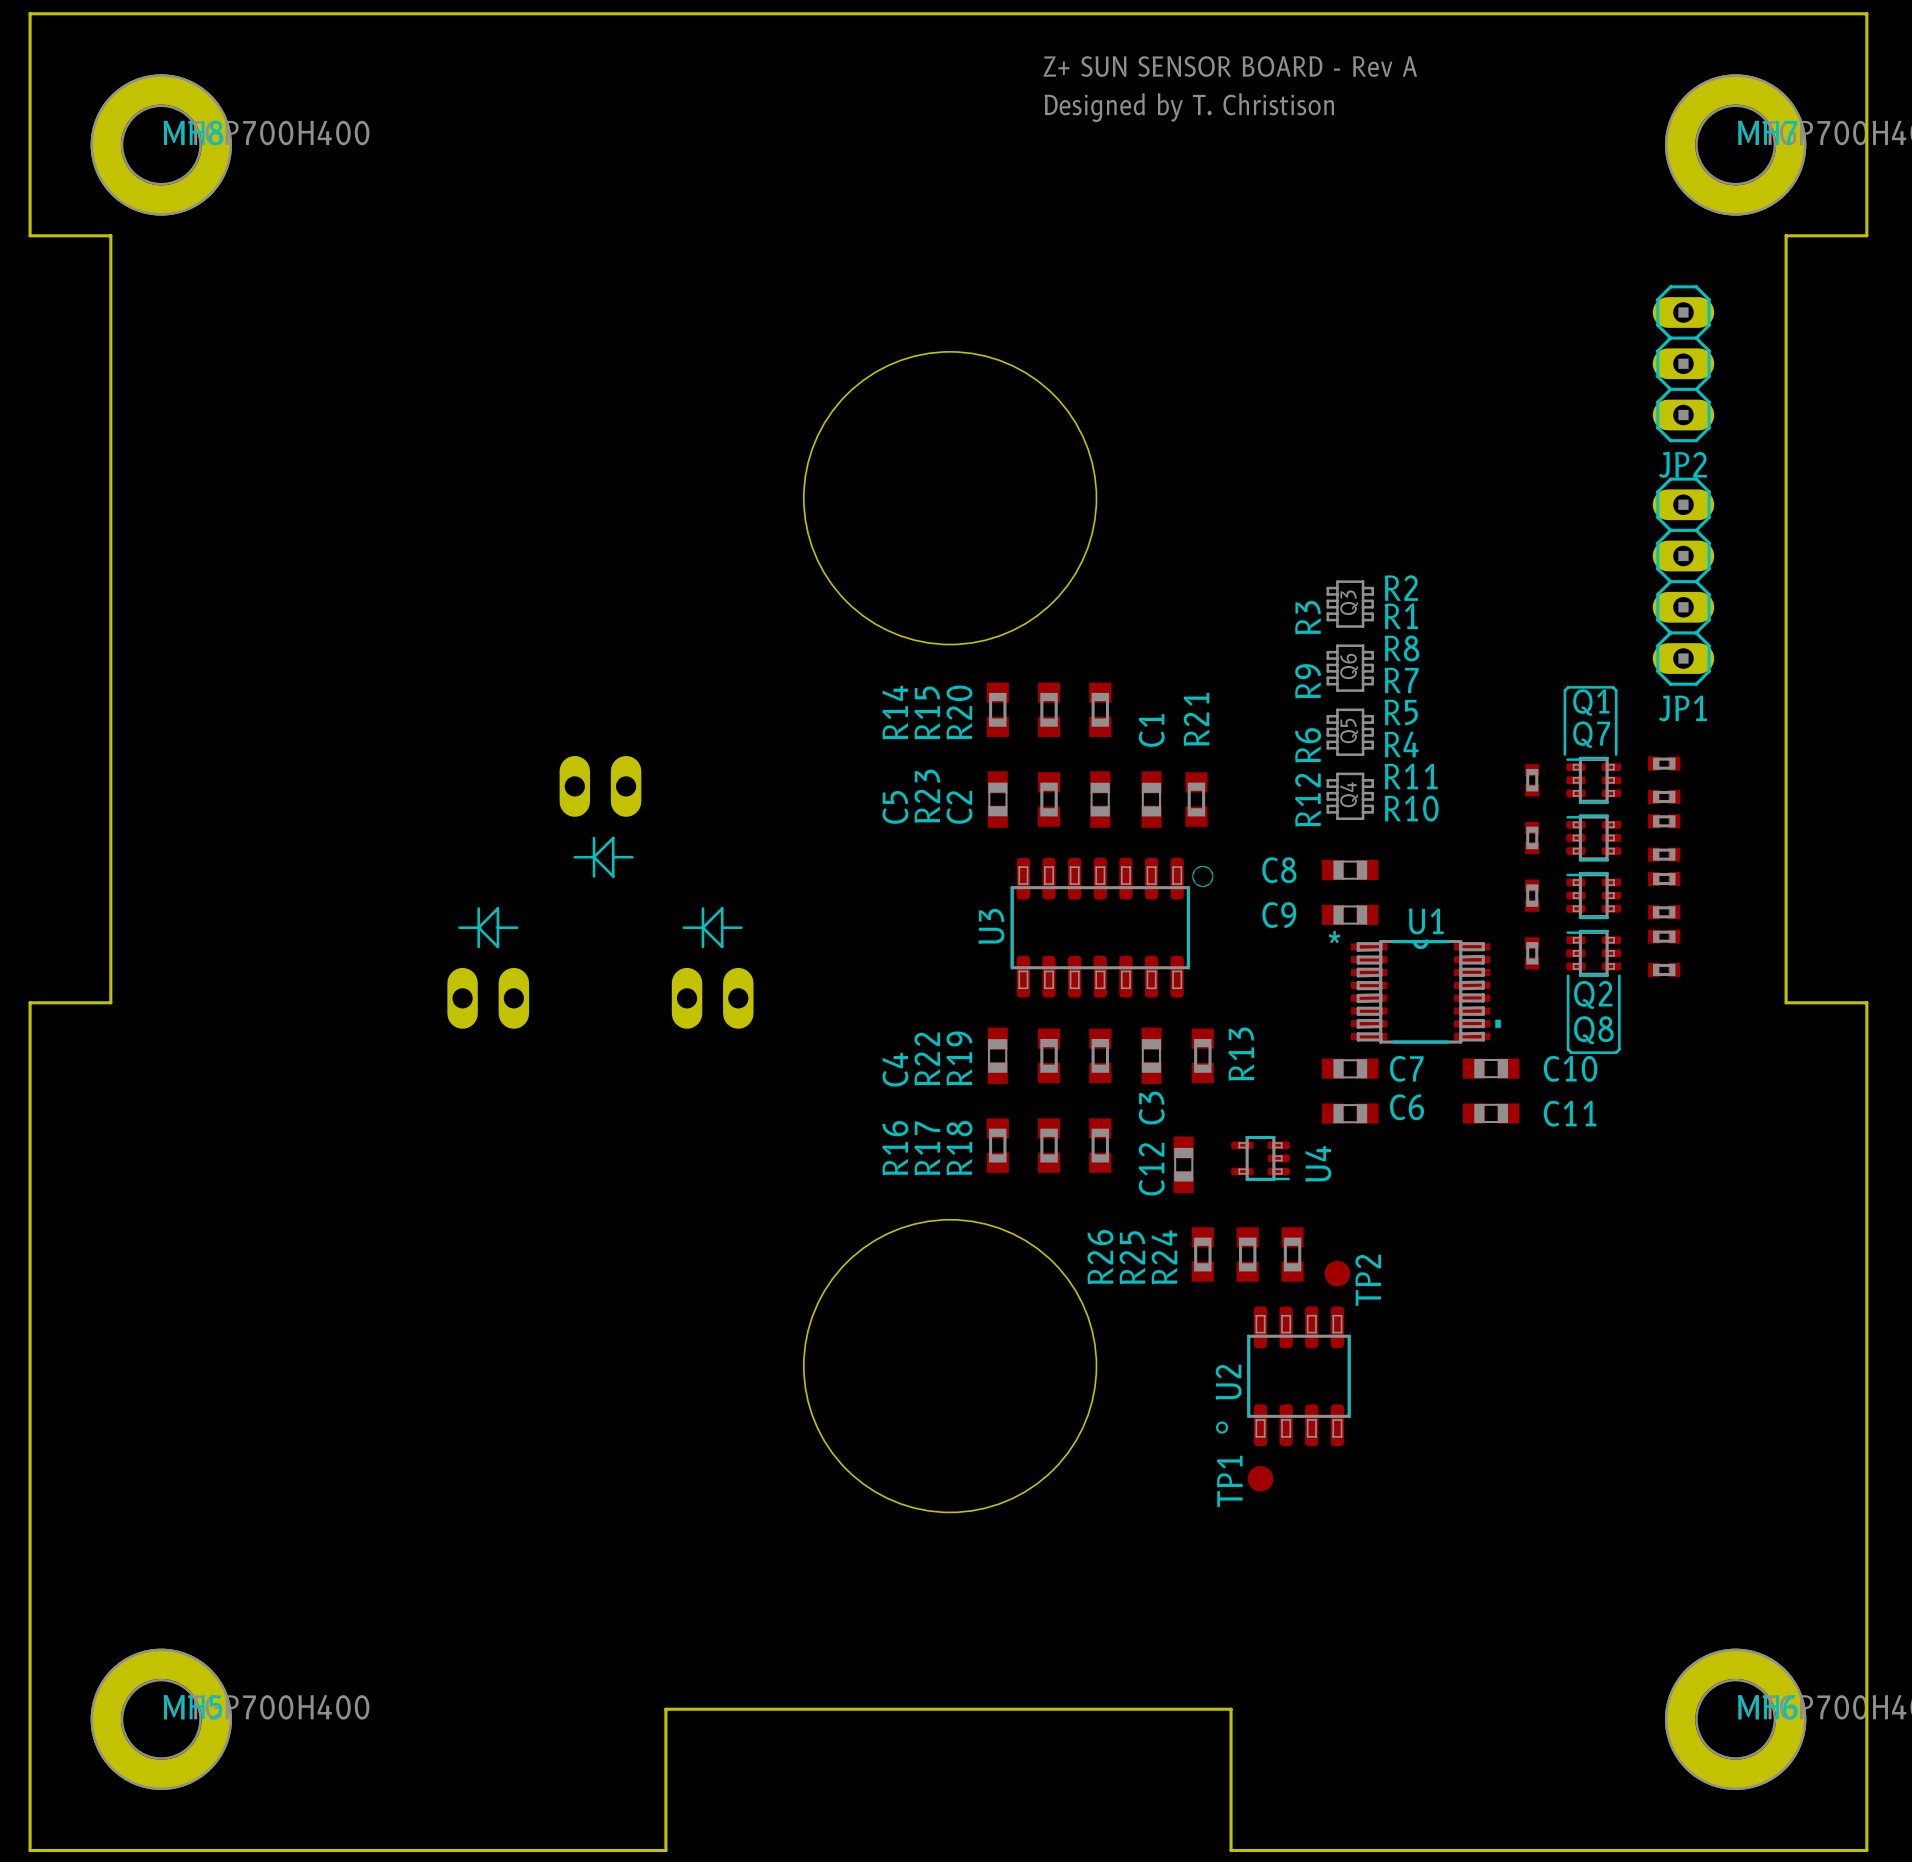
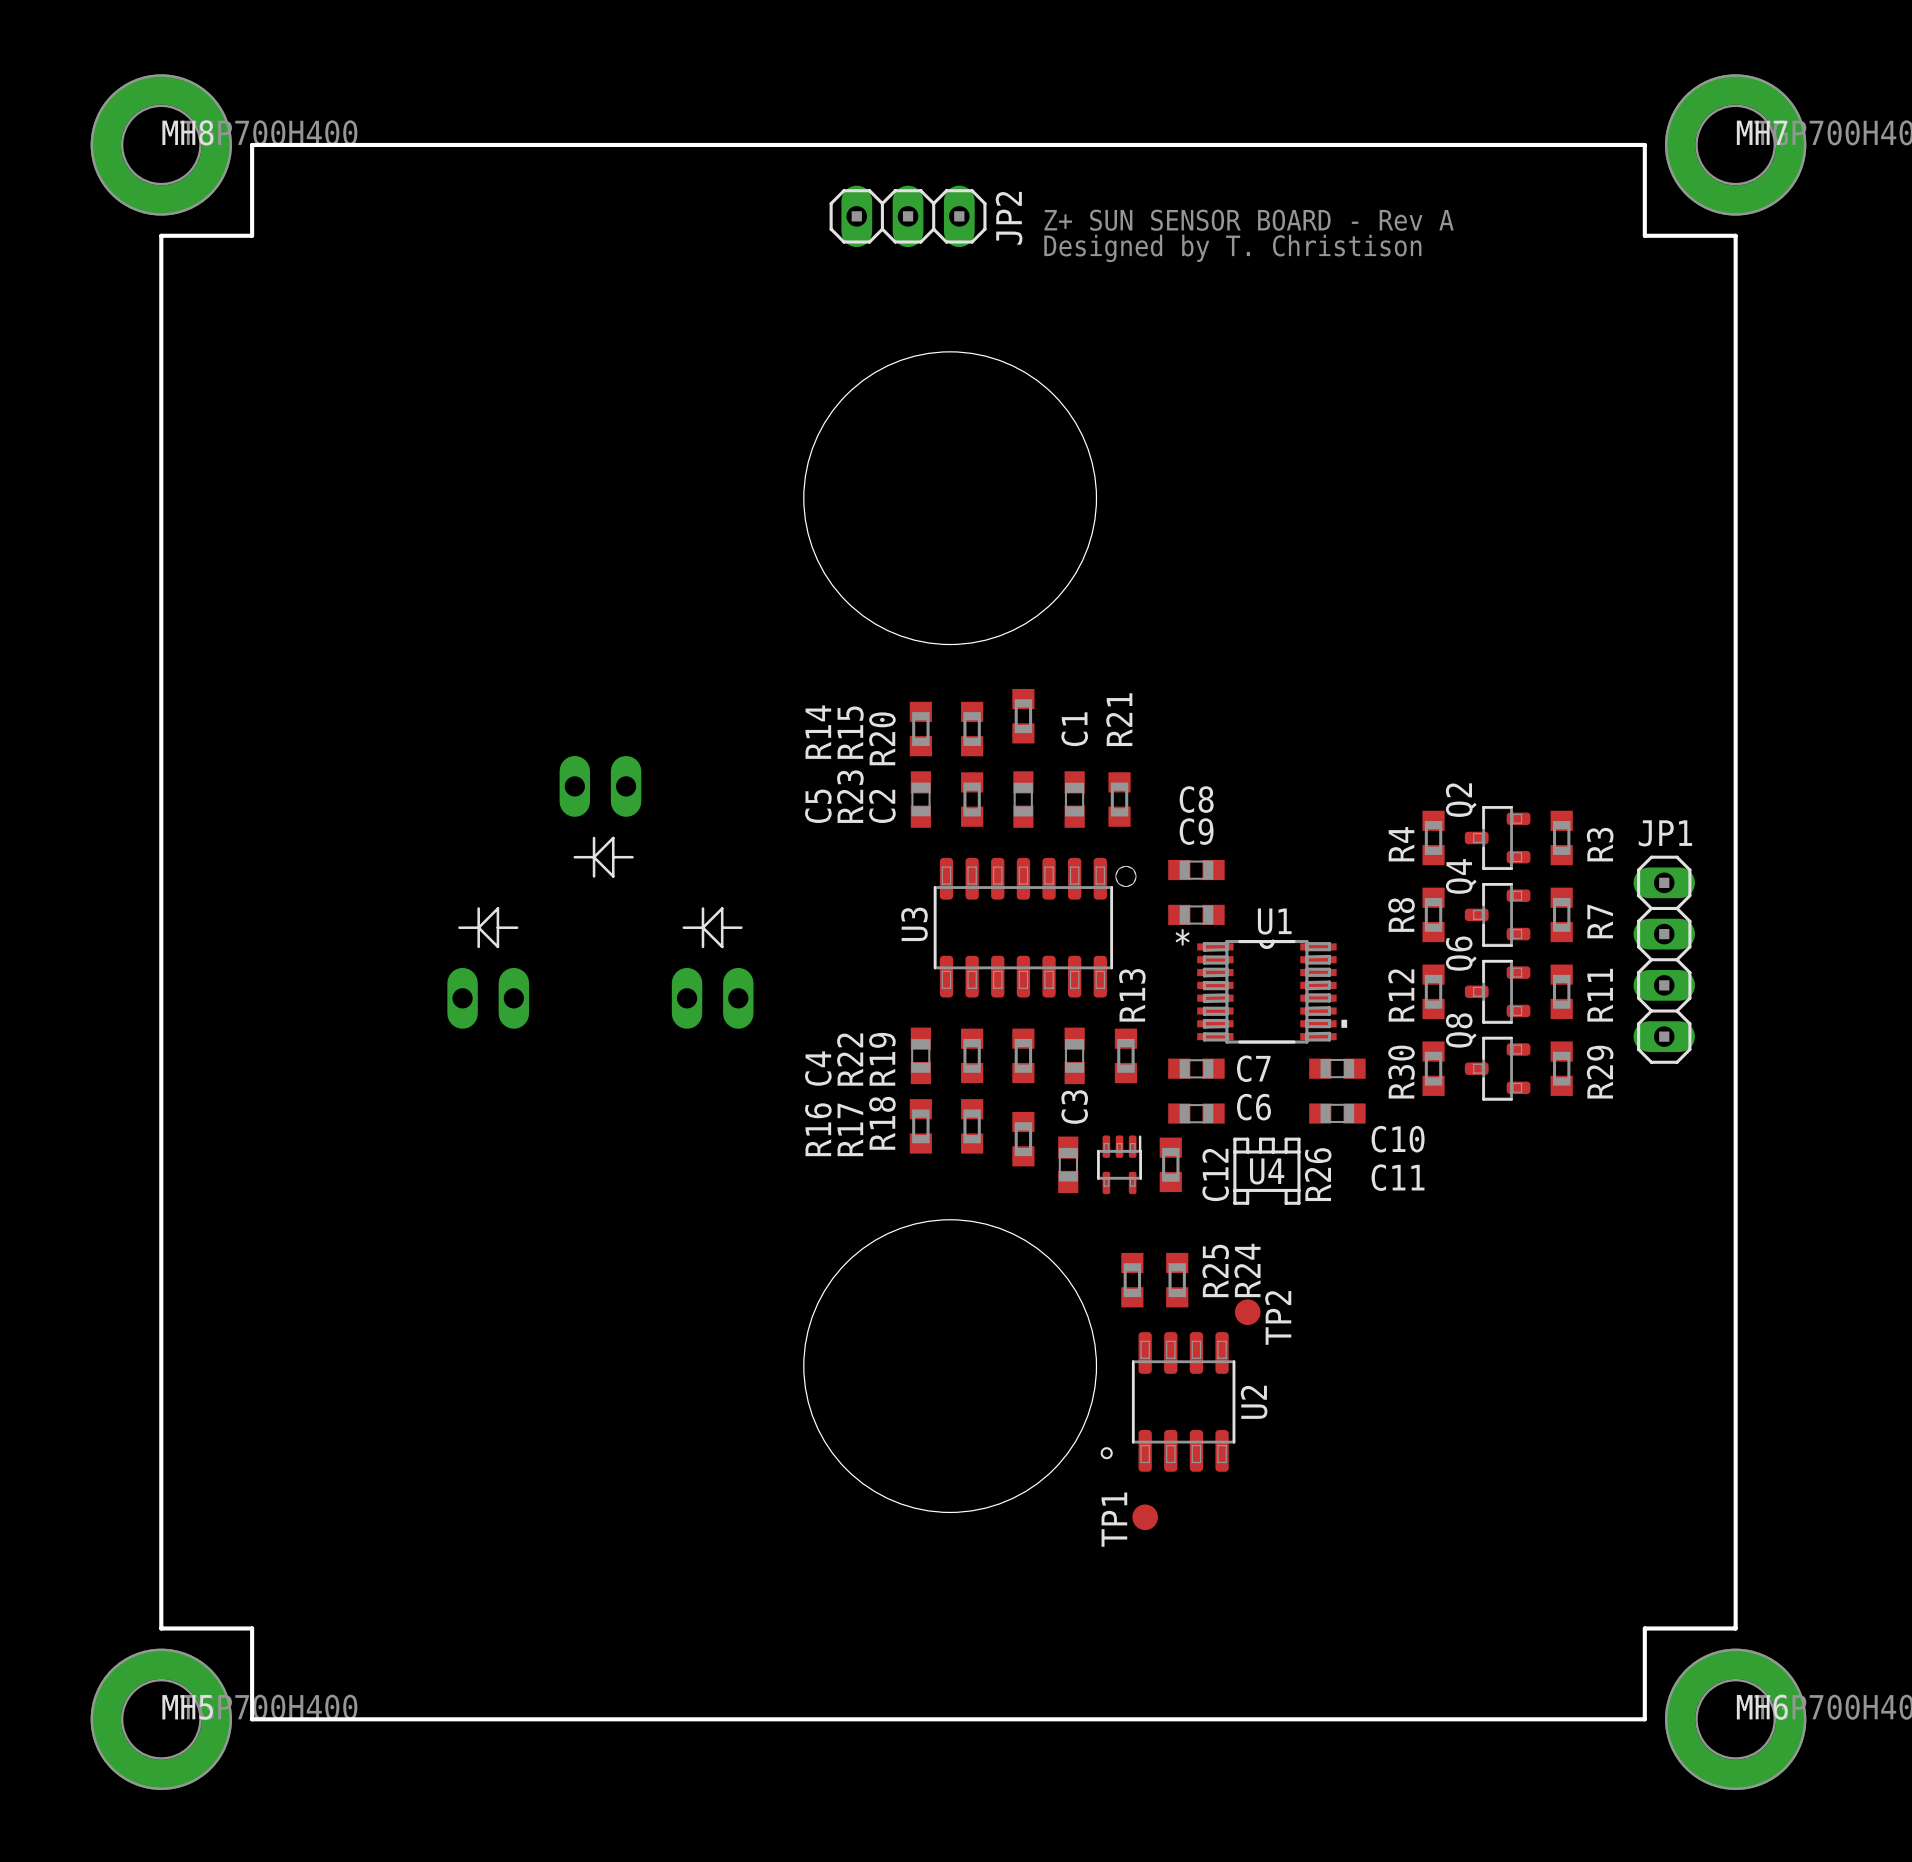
board edge: (30, 13) (1866, 13) (1866, 235) (1786, 235) (1786, 1002) (1866, 1002) (1866, 1850) (1231, 1850) (1231, 1709) (665, 1709) (665, 1850) (30, 1850) (30, 1002) (110, 1002) (110, 235) (30, 235) (30, 13) -> (252, 144) (252, 235) (161, 235) (161, 1628) (252, 1628) (252, 1719) (1644, 1719) (1644, 1628) (1735, 1628) (1735, 235) (1644, 235) (1644, 144) (252, 144)
text position: Z+ SUN SENSOR BOARD - Rev A (1230, 66) -> Z+ SUN SENSOR BOARD - Rev A (1249, 220)
text position: Designed by T. Christison (1189, 107) -> Designed by T. Christison (1232, 248)
JP2 rotation: 0° (1683, 363) -> 90° clockwise (908, 216)
JP2 position: (1683, 363) -> (908, 216)
JP2 name position: JP2 (1682, 464) -> JP2 (1009, 218)
line: (1337, 581) (1363, 581) (1363, 626) (1337, 626) (1337, 581) -> none
JP1 position: (1683, 581) -> (1664, 959)
line: (1337, 588) (1327, 588) (1327, 594) (1337, 594) -> none
line: (1363, 588) (1372, 588) (1372, 594) (1363, 594) -> none
line: (1337, 600) (1327, 600) (1327, 607) (1337, 607) -> none
line: (1363, 600) (1372, 600) (1372, 607) (1363, 607) -> none
text: Q3 (1349, 602) -> none
line: (1337, 613) (1327, 613) (1327, 620) (1337, 620) -> none
line: (1363, 613) (1372, 613) (1372, 620) (1363, 620) -> none
R3 name position: R3 (1308, 617) -> R3 (1600, 844)
line: (1337, 645) (1337, 690) (1363, 690) (1363, 645) (1337, 645) -> none
R8 name position: R8 (1401, 648) -> R8 (1401, 914)
line: (1337, 652) (1327, 652) (1327, 658) (1337, 658) -> none
line: (1363, 652) (1372, 652) (1372, 658) (1363, 658) -> none
line: (1337, 664) (1327, 664) (1327, 671) (1337, 671) -> none
line: (1363, 664) (1372, 664) (1372, 671) (1363, 671) -> none
text: Q6 (1349, 666) -> none
line: (1337, 677) (1327, 677) (1327, 684) (1337, 684) -> none
line: (1363, 677) (1372, 677) (1372, 684) (1363, 684) -> none
R7 name position: R7 (1401, 680) -> R7 (1600, 921)
JP1 name position: JP1 (1682, 708) -> JP1 (1665, 833)
R14 position: (997, 709) -> (920, 729)
R15 position: (1049, 709) -> (972, 729)
R20 position: (1100, 709) -> (1023, 716)
line: (1337, 709) (1337, 754) (1363, 754) (1363, 709) (1337, 709) -> none
R20 name position: R20 (959, 712) -> R20 (882, 738)
line: (1337, 716) (1327, 716) (1327, 722) (1337, 722) -> none
line: (1363, 716) (1372, 716) (1372, 722) (1363, 722) -> none
line: (1337, 729) (1327, 729) (1327, 735) (1337, 735) -> none
line: (1363, 729) (1372, 729) (1372, 735) (1363, 735) -> none
text: Q5 (1349, 730) -> none
line: (1337, 741) (1327, 741) (1327, 748) (1337, 748) -> none
line: (1363, 741) (1372, 741) (1372, 748) (1363, 748) -> none
R4 name position: R4 (1401, 744) -> R4 (1401, 844)
line: (1564, 754) (1564, 690) (1568, 687) (1612, 687) (1616, 690) (1616, 754) -> none
R2: (1664, 763) -> none
R3 footprint: [1525, 764, 1540, 797] -> [1550, 810, 1573, 866]
line: (1337, 773) (1337, 818) (1363, 818) (1363, 773) (1337, 773) -> none
R11 name position: R11 (1411, 776) -> R11 (1600, 995)
line: (1337, 780) (1327, 780) (1327, 786) (1337, 786) -> none
line: (1363, 780) (1372, 780) (1372, 786) (1363, 786) -> none
Q1: (1593, 780) -> none
line: (1337, 793) (1327, 793) (1327, 799) (1337, 799) -> none
line: (1363, 793) (1372, 793) (1372, 799) (1363, 799) -> none
text: Q4 (1349, 794) -> none
R1: (1664, 796) -> none
C5 position: (997, 799) -> (920, 799)
R23 position: (1049, 799) -> (972, 799)
C2 position: (1100, 799) -> (1023, 799)
C1 position: (1151, 799) -> (1074, 799)
R21 position: (1196, 799) -> (1119, 799)
R12 name position: R12 (1307, 800) -> R12 (1401, 995)
line: (1337, 805) (1327, 805) (1327, 812) (1337, 812) -> none
line: (1363, 805) (1372, 805) (1372, 812) (1363, 812) -> none
R8 footprint: [1648, 814, 1681, 829] -> [1422, 887, 1445, 943]
R9: (1532, 837) -> none
Q7: (1593, 837) -> none
R7 footprint: [1648, 847, 1681, 862] -> [1550, 887, 1573, 943]
C8 name position: C8 (1279, 870) -> C8 (1196, 799)
C8 position: (1350, 870) -> (1196, 870)
Q2 footprint: [1566, 872, 1622, 920] -> [1464, 806, 1531, 870]
R5: (1664, 878) -> none
R6: (1532, 895) -> none
R4 footprint: [1648, 905, 1681, 920] -> [1422, 810, 1445, 866]
C9 position: (1350, 914) -> (1196, 914)
Q4: none -> (1497, 914)
C9 name position: C9 (1279, 915) -> C9 (1196, 831)
U3 position: (1112, 927) -> (1035, 927)
Q8 footprint: [1566, 929, 1622, 977] -> [1464, 1036, 1531, 1101]
R11 footprint: [1648, 929, 1681, 944] -> [1550, 964, 1573, 1020]
R12 footprint: [1525, 937, 1540, 970] -> [1422, 964, 1445, 1020]
R10: (1664, 969) -> none
line: (1568, 975) (1568, 1049) (1571, 1052) (1616, 1052) (1619, 1049) (1619, 975) -> none
U1 position: (1425, 991) -> (1272, 991)
Q6: none -> (1497, 991)
Q2 name position: Q2 (1593, 994) -> Q2 (1461, 800)
Q8 name position: Q8 (1593, 1030) -> Q8 (1461, 1030)
R13 name position: R13 (1241, 1054) -> R13 (1132, 995)
C4 position: (997, 1055) -> (920, 1055)
R22 position: (1049, 1055) -> (972, 1055)
R19 position: (1100, 1055) -> (1023, 1055)
C3 position: (1151, 1055) -> (1074, 1055)
R13 position: (1202, 1055) -> (1125, 1055)
C7 position: (1350, 1068) -> (1196, 1068)
R30: none -> (1433, 1068)
C10 position: (1491, 1068) -> (1337, 1068)
R29: none -> (1561, 1068)
C10 name position: C10 (1570, 1068) -> C10 (1398, 1139)
C6 position: (1350, 1113) -> (1196, 1113)
C11 position: (1491, 1113) -> (1337, 1113)
C11 name position: C11 (1570, 1113) -> C11 (1398, 1177)
R16 position: (997, 1145) -> (920, 1126)
R17 position: (1049, 1145) -> (972, 1126)
R18 position: (1100, 1145) -> (1023, 1139)
R18 name position: R18 (959, 1148) -> R18 (882, 1123)
line: none -> (1234, 1151) (1298, 1151)
line: none -> (1247, 1151) (1247, 1139) (1234, 1139) (1234, 1203) (1247, 1203) (1247, 1190)
line: none -> (1260, 1151) (1260, 1139) (1273, 1139) (1273, 1151)
line: none -> (1286, 1151) (1286, 1139) (1298, 1139) (1298, 1203) (1286, 1203) (1286, 1190)
U4 rotation: 0° (1260, 1158) -> 90° counterclockwise (1119, 1164)
U4 position: (1260, 1158) -> (1119, 1164)
U4 name position: U4 (1318, 1163) -> U4 (1267, 1171)
C12 position: (1183, 1164) -> (1068, 1164)
C12 name position: C12 (1151, 1169) -> C12 (1215, 1174)
line: none -> (1234, 1190) (1298, 1190)
R26 position: (1202, 1254) -> (1170, 1164)
R25 position: (1247, 1254) -> (1132, 1280)
R24 position: (1292, 1254) -> (1177, 1280)
R26 name position: R26 (1100, 1257) -> R26 (1318, 1174)
R25 name position: R25 (1132, 1257) -> R25 (1215, 1270)
R24 name position: R24 (1164, 1257) -> R24 (1247, 1270)
TP2 position: (1337, 1273) -> (1247, 1312)
U2 position: (1283, 1376) -> (1167, 1401)
U2 name position: U2 (1228, 1382) -> U2 (1254, 1402)
TP1 position: (1260, 1478) -> (1145, 1517)

